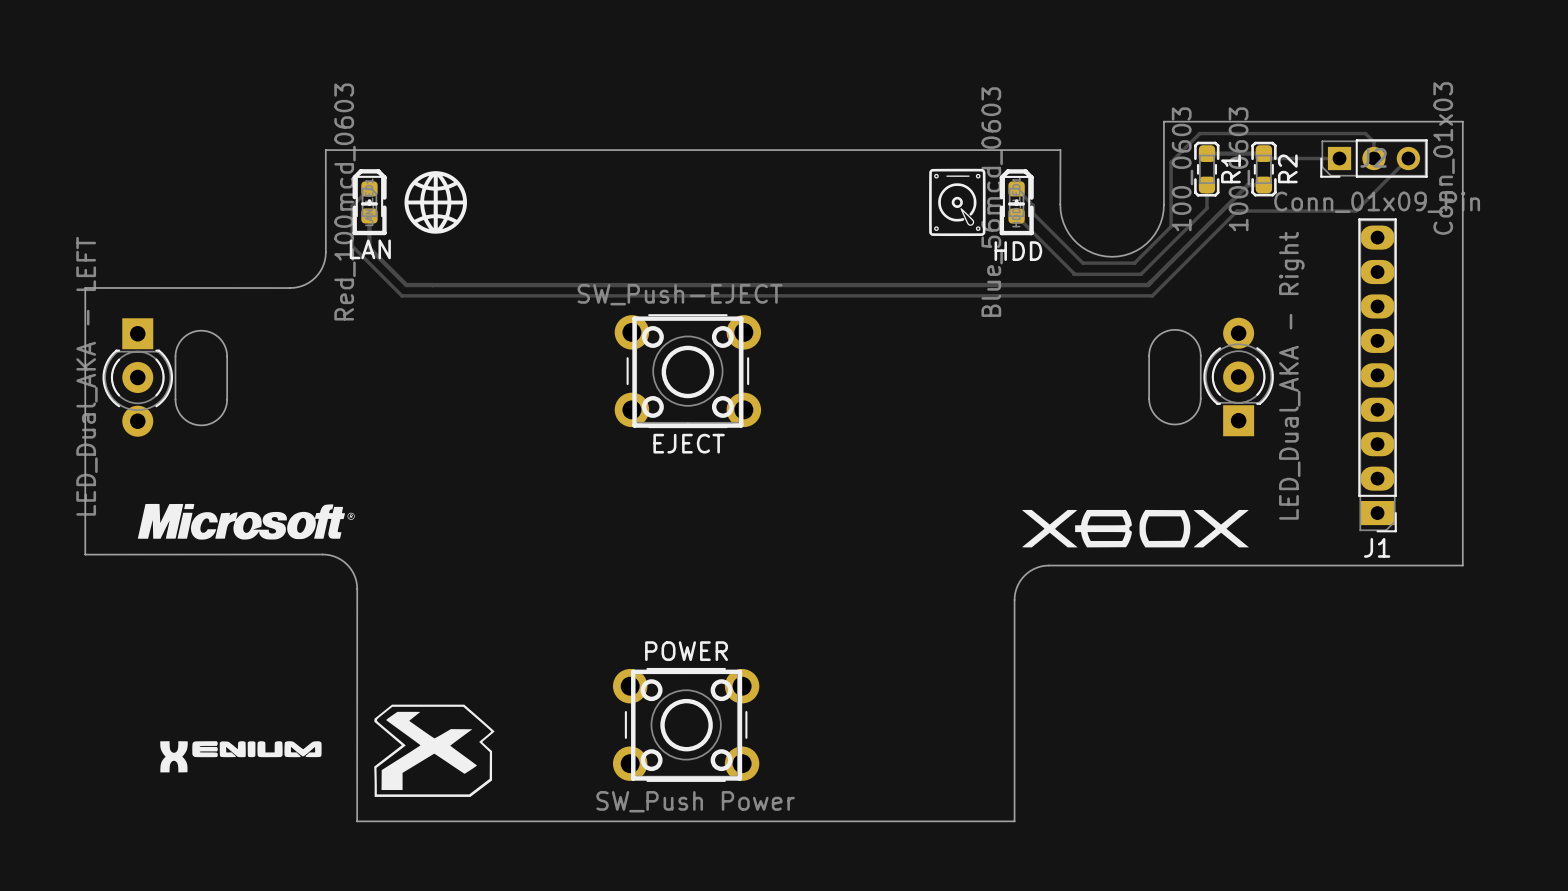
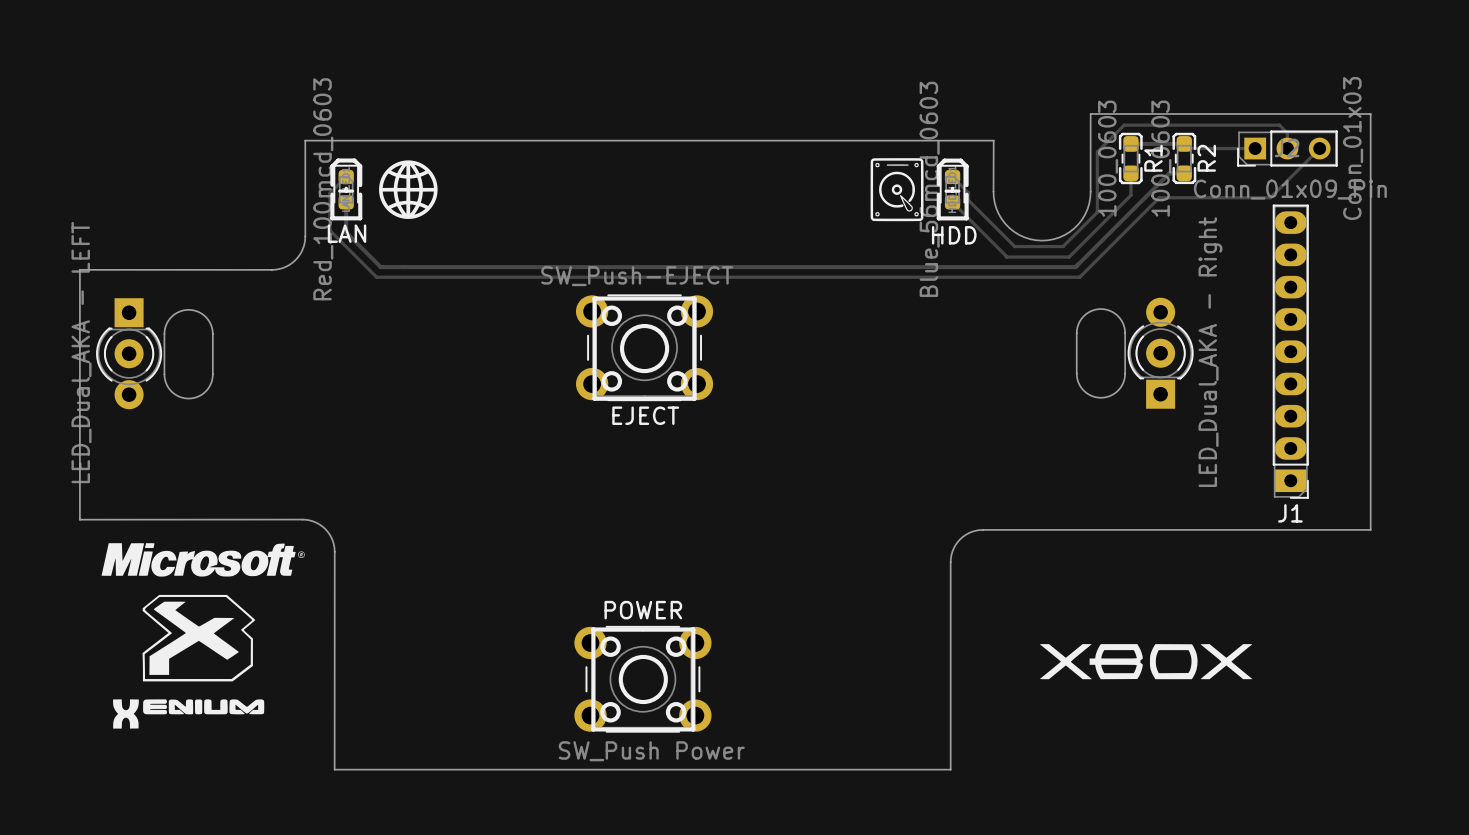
drawing position: (246, 521) -> (203, 559)
drawing position: (1135, 528) -> (1146, 661)
drawing position: (434, 750) -> (198, 638)
drawing position: (240, 756) -> (188, 713)

